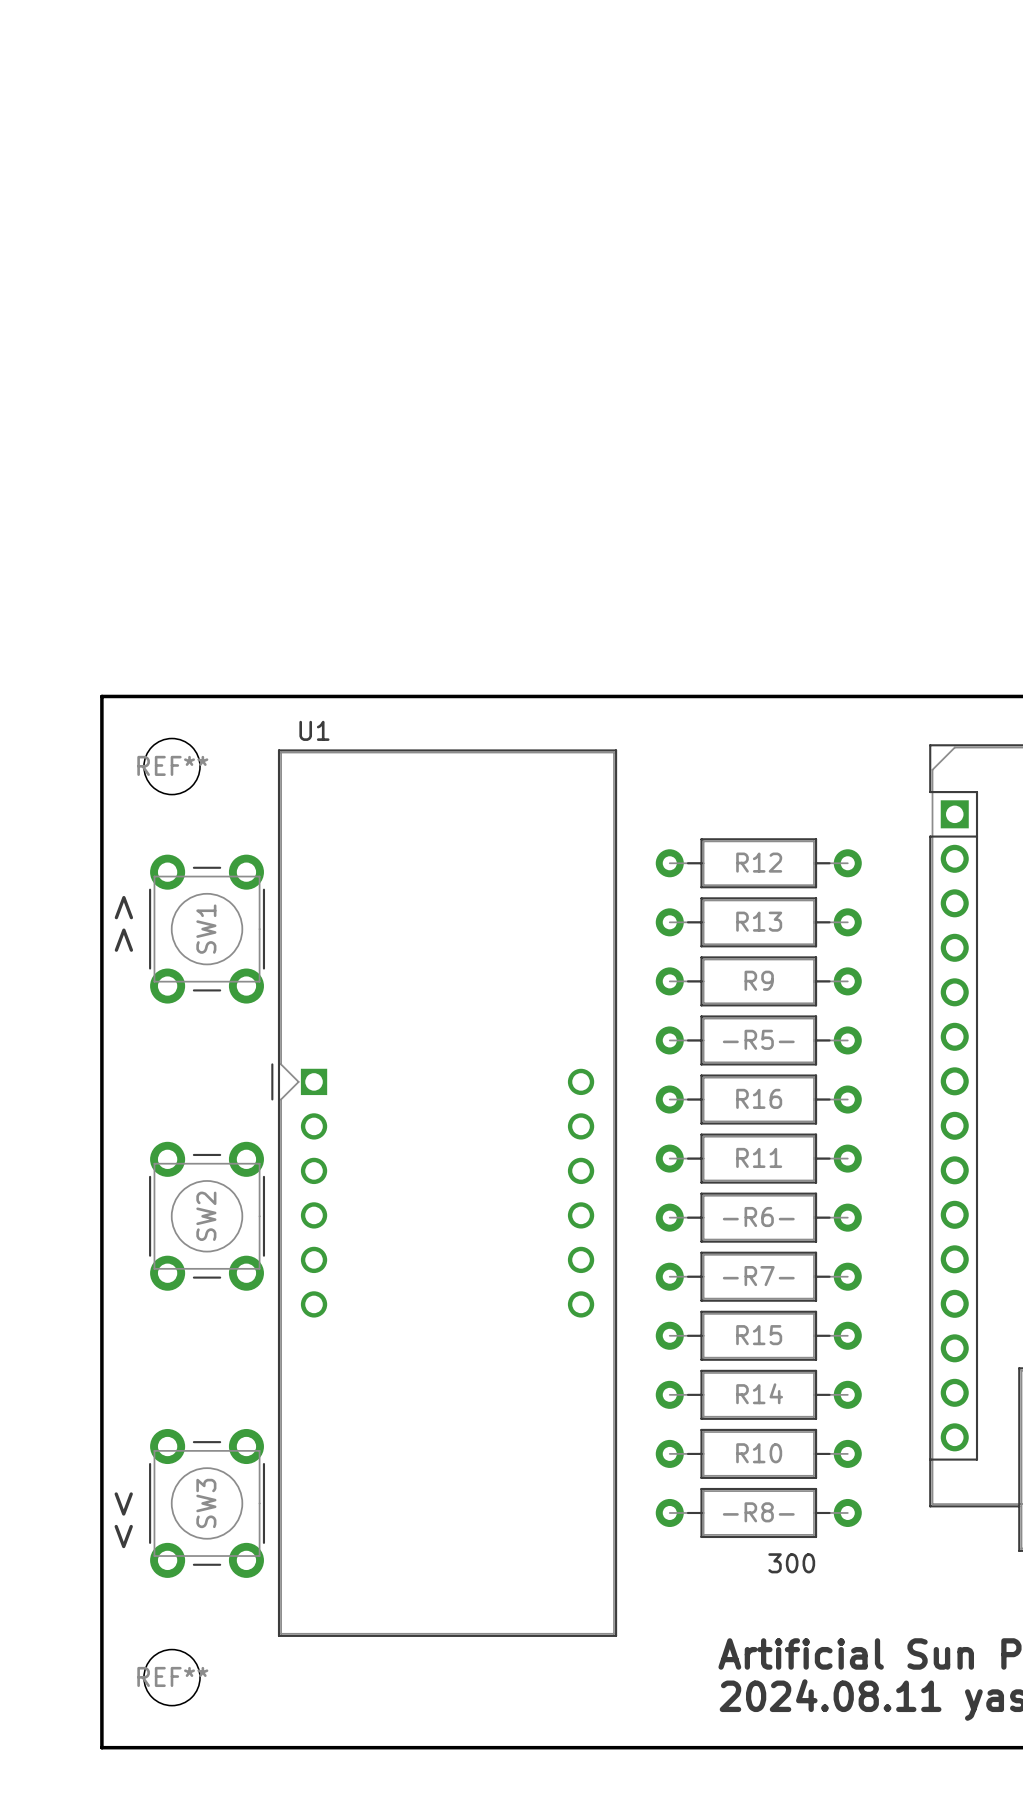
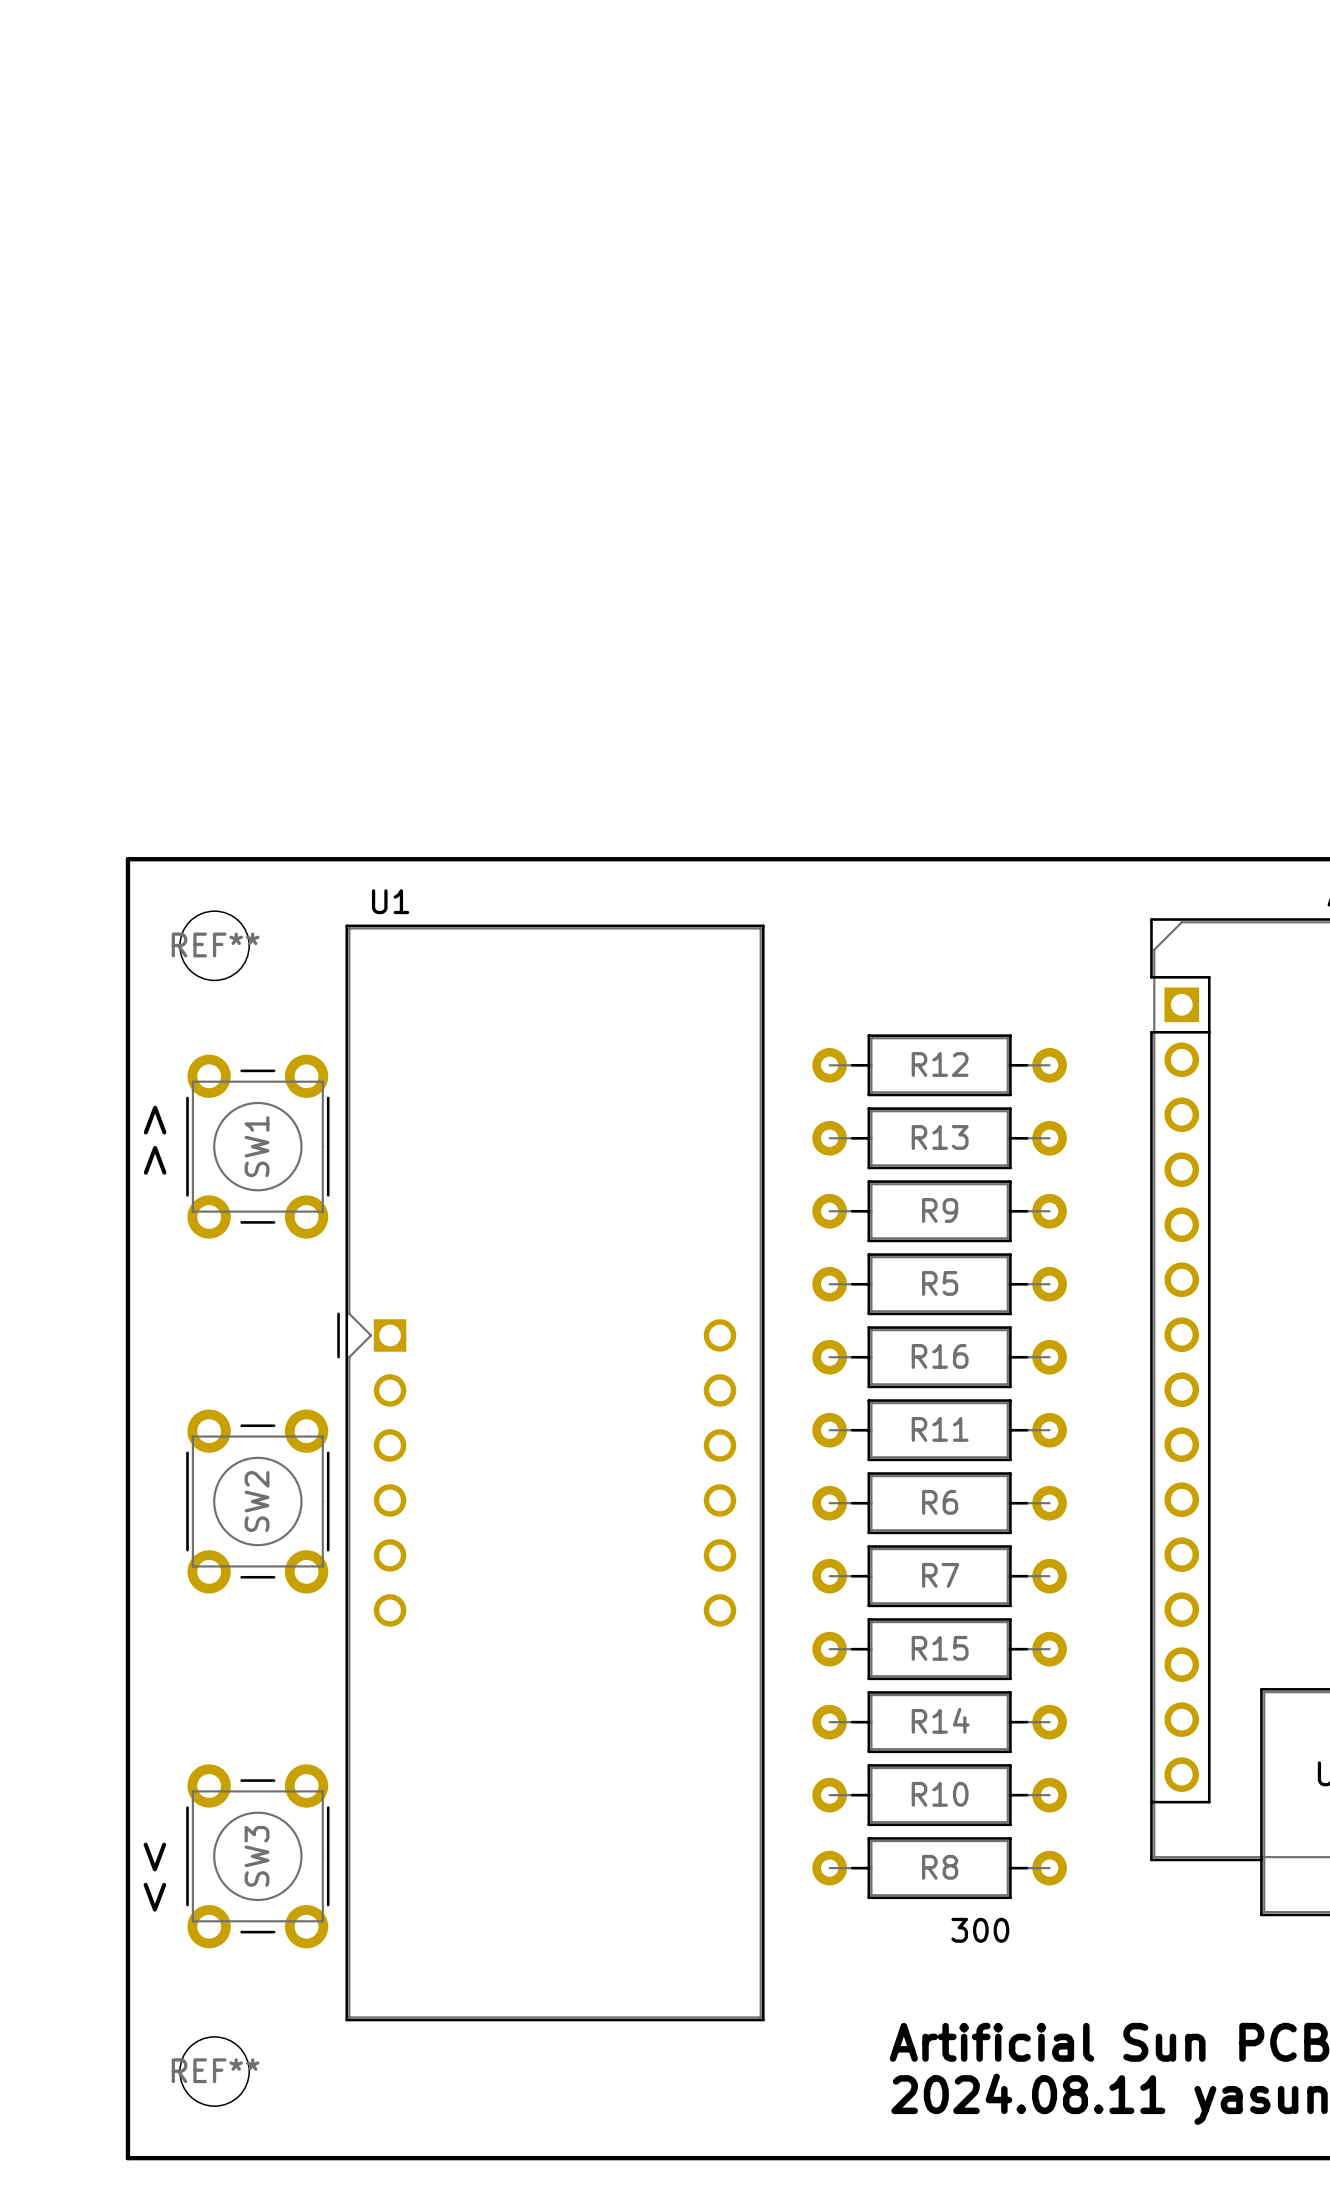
R5 text: -R5- (758, 1039) -> none
R6 text: -R6- (758, 1217) -> none
R7 text: -R7- (758, 1276) -> none
R8 text: -R8- (758, 1512) -> none

